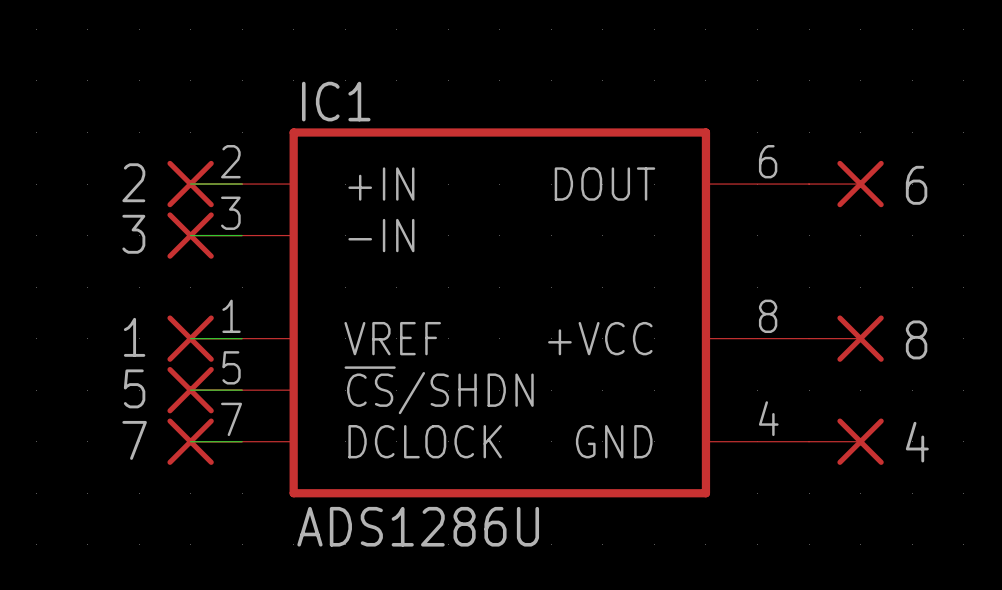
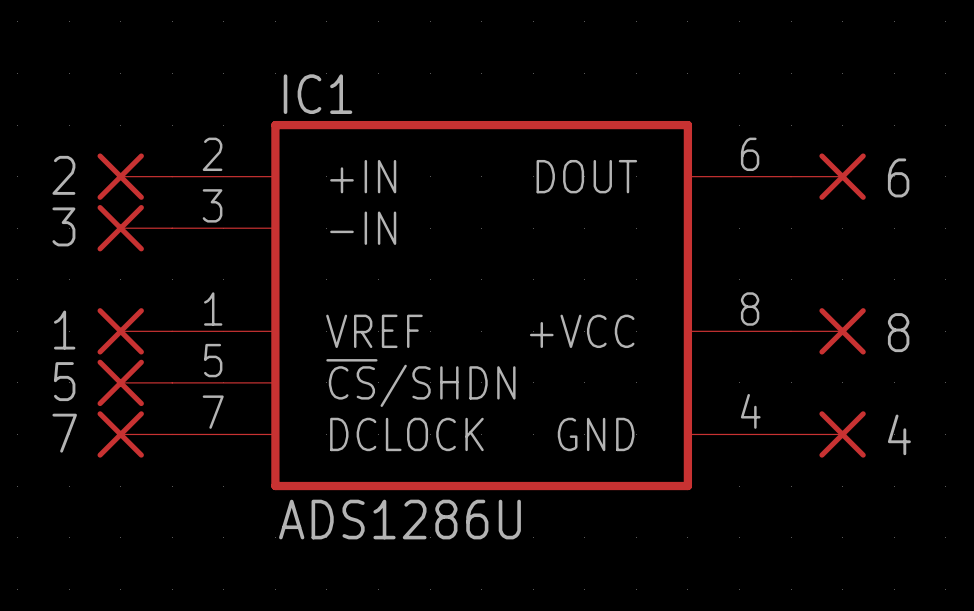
2 position: (204, 184) -> (134, 176)
3 position: (204, 235) -> (134, 228)
1 position: (204, 338) -> (134, 331)
5 position: (204, 390) -> (134, 382)
7 position: (204, 441) -> (134, 434)

